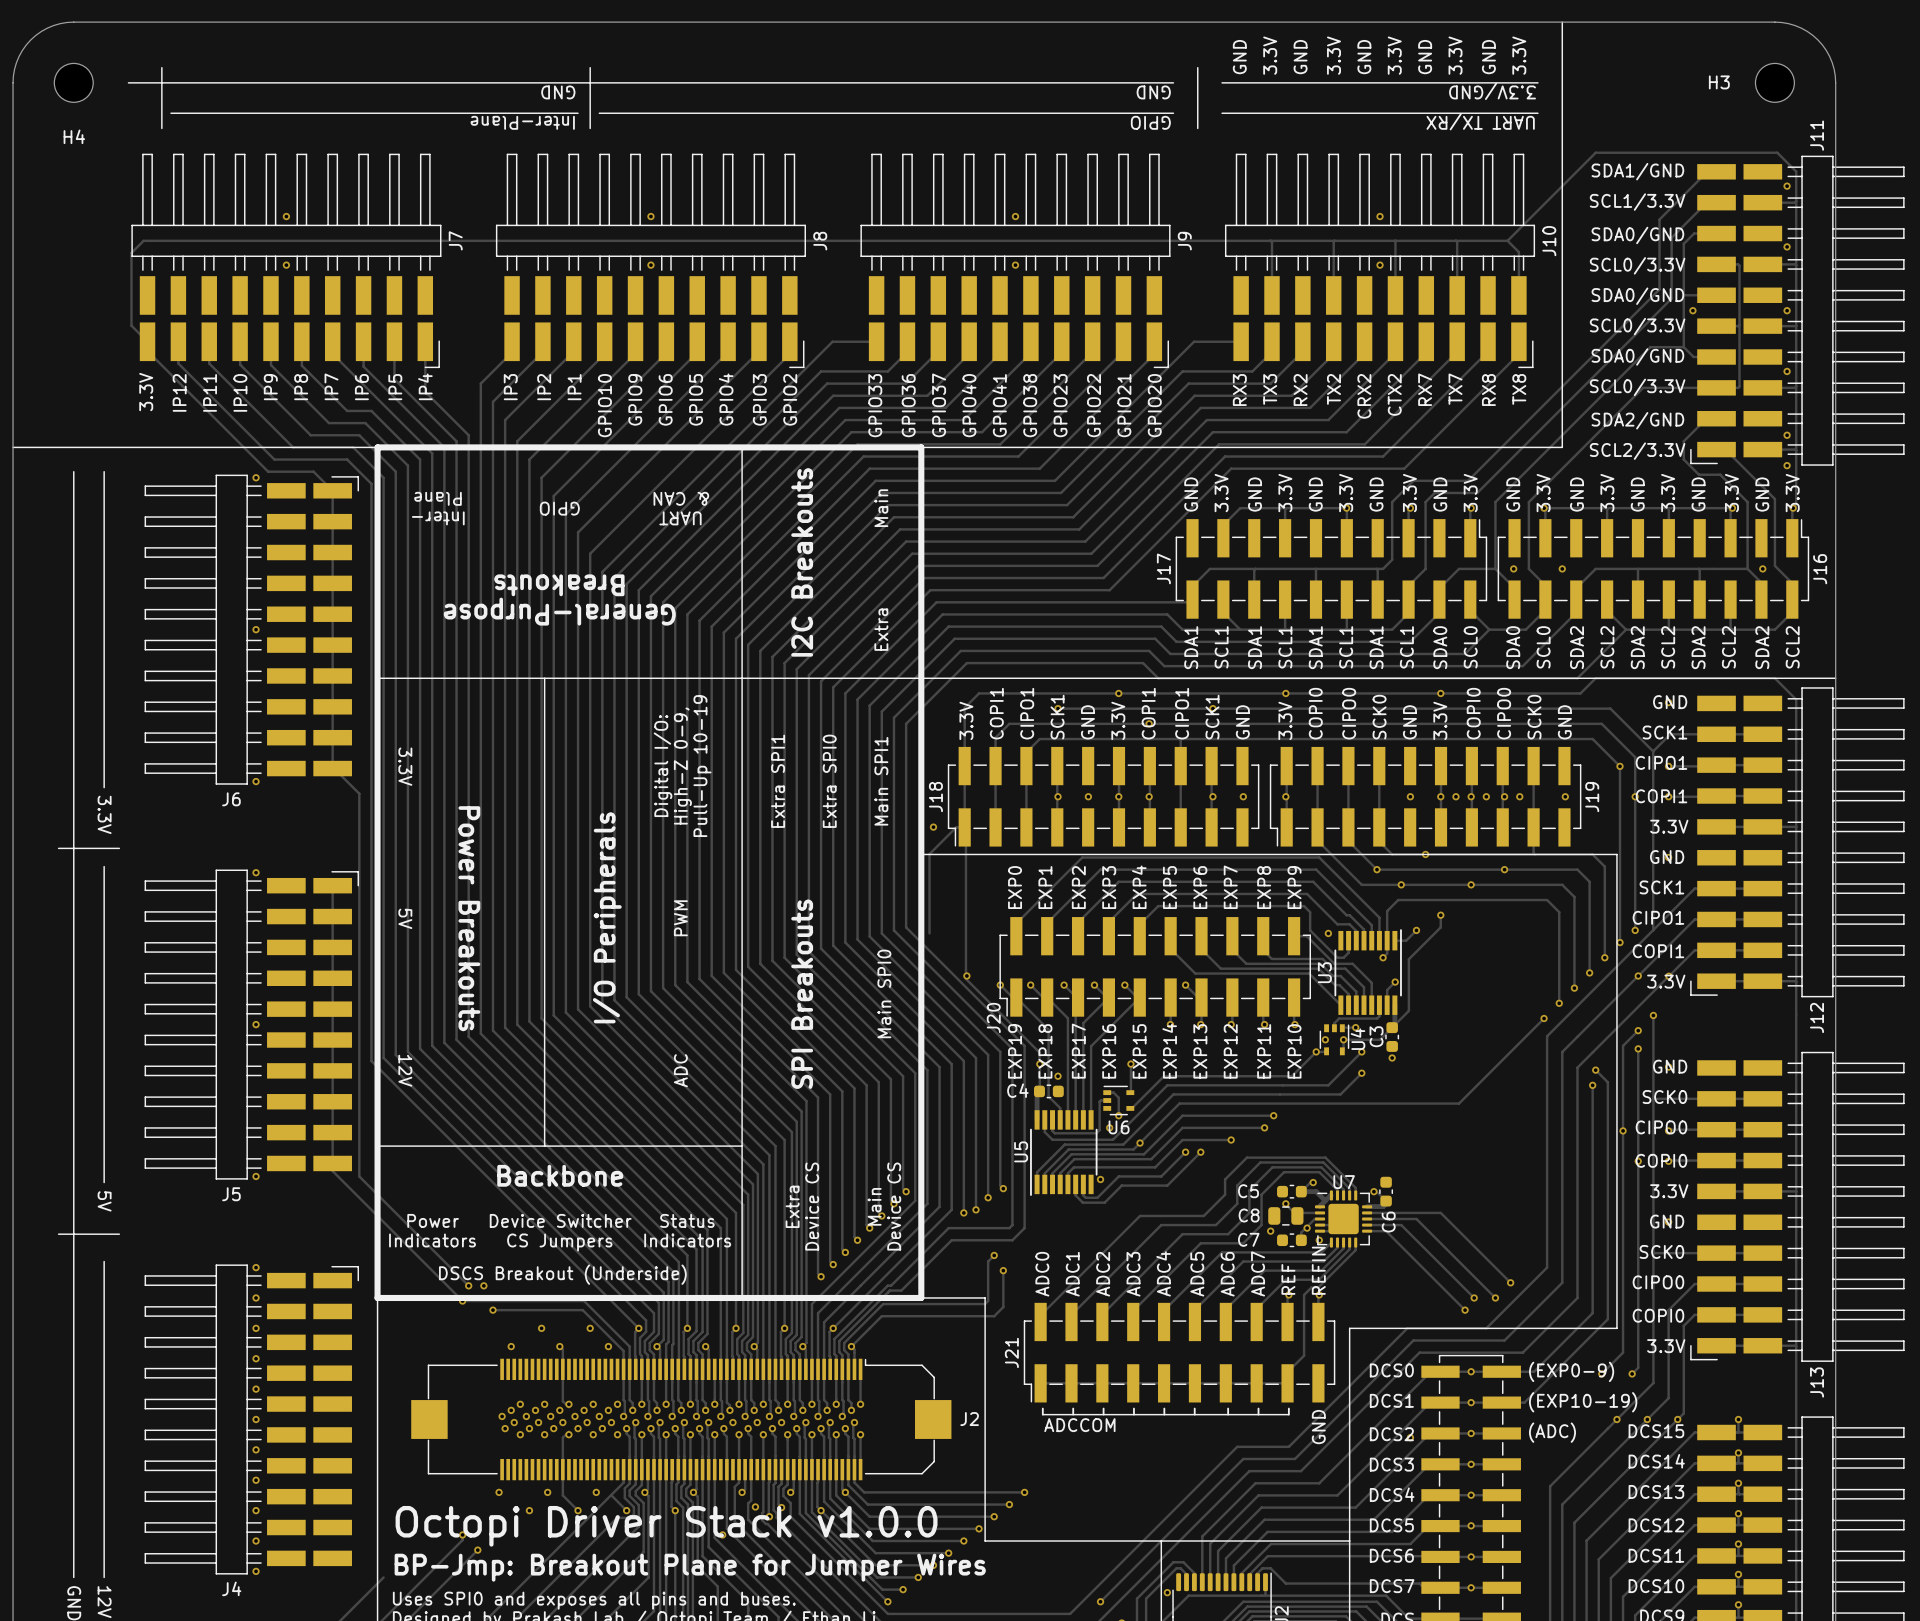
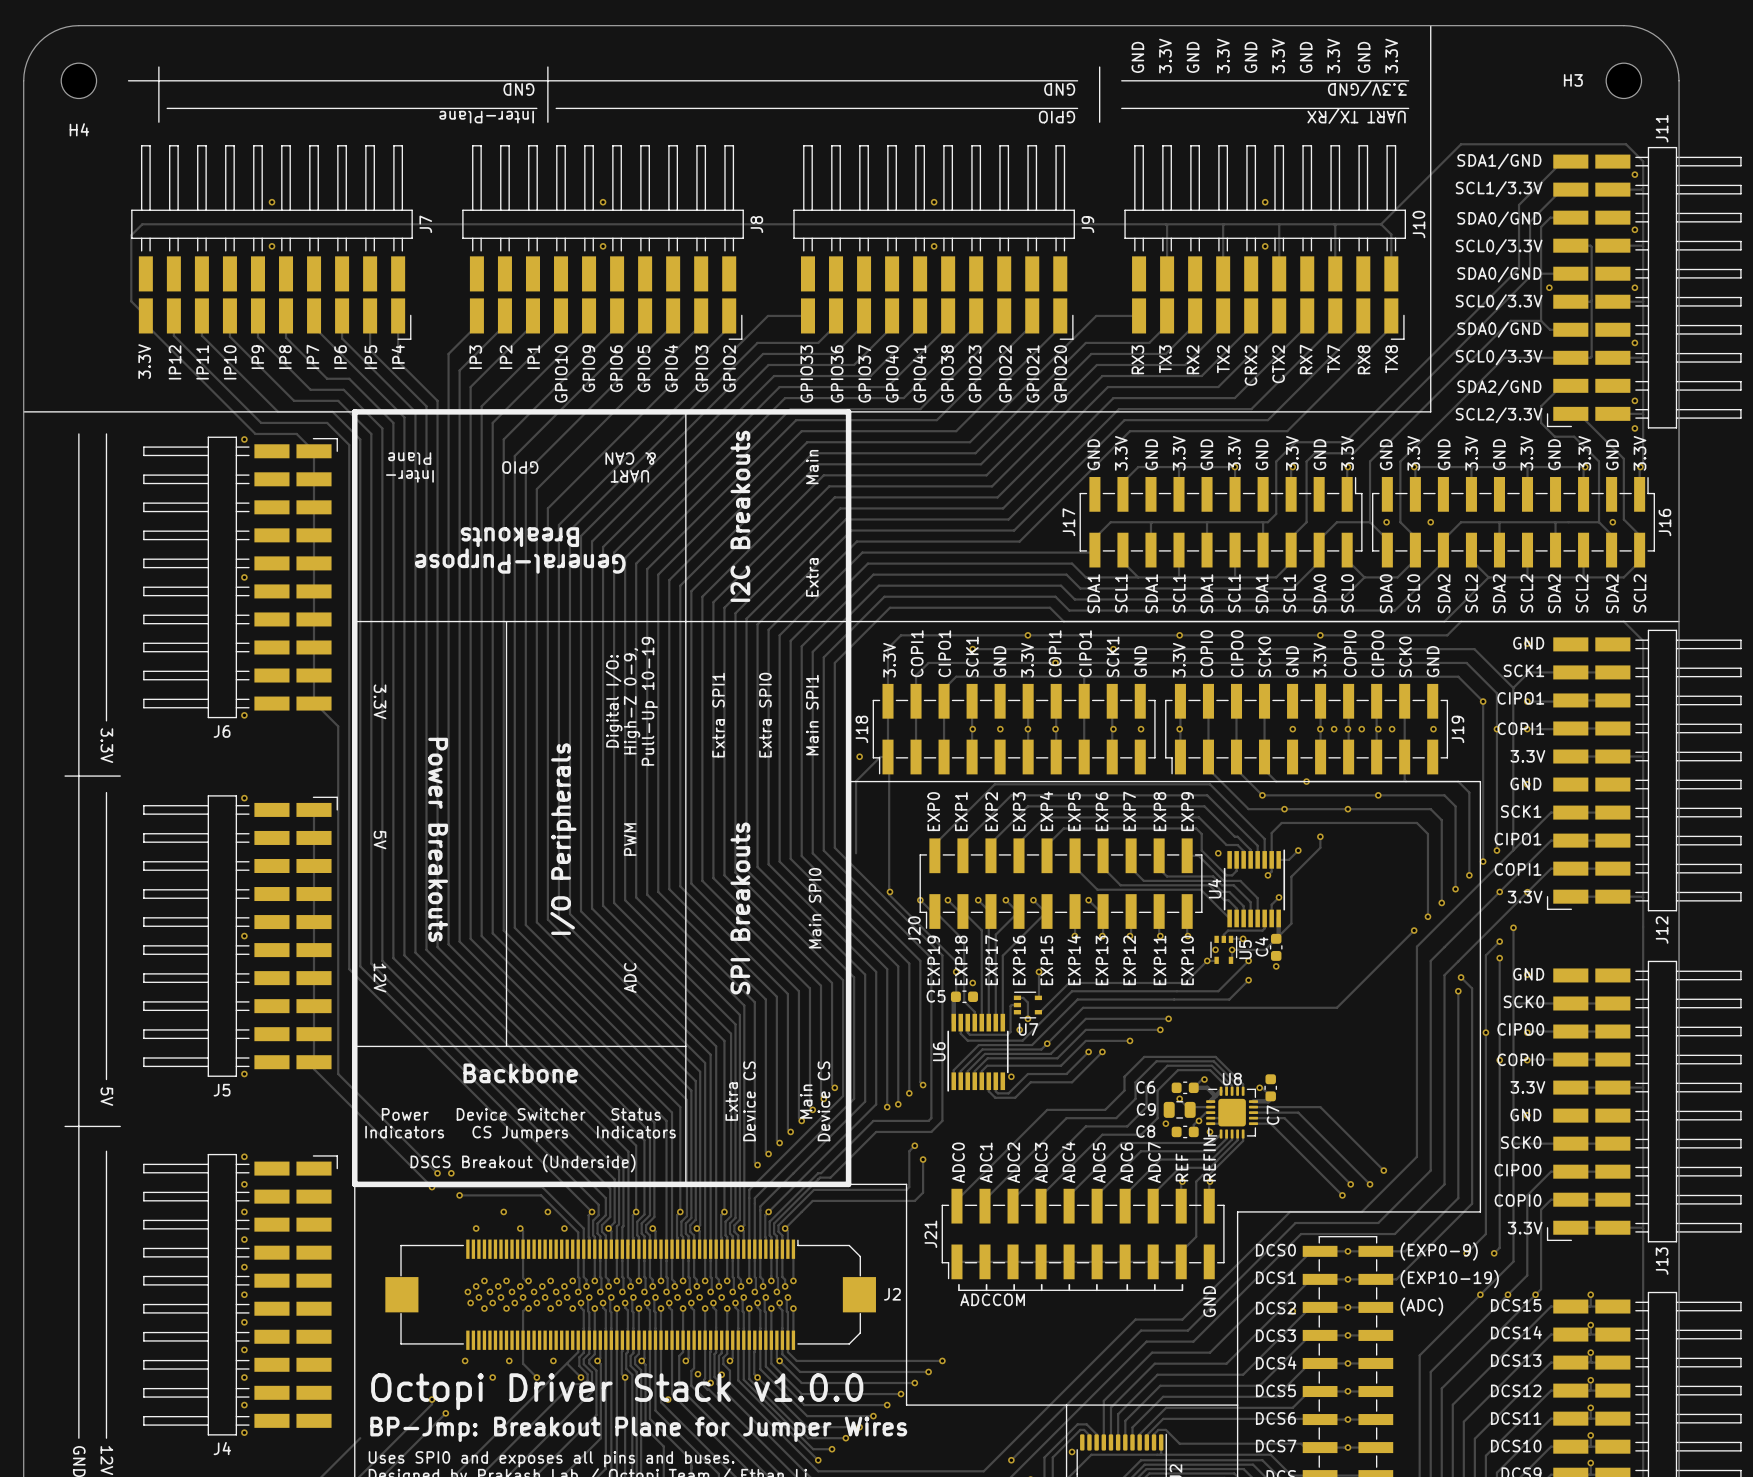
U3 name: U3 (1324, 972) -> U4 (1214, 888)
C3 name: C3 (1376, 1036) -> C4 (1261, 946)
U4 name: U4 (1358, 1039) -> U5 (1245, 949)
C4 name: C4 (1017, 1090) -> C5 (936, 996)
U6 name: U6 (1119, 1127) -> U7 (1028, 1029)
U5 name: U5 (1021, 1151) -> U6 (939, 1051)
U7 name: U7 (1344, 1182) -> U8 (1232, 1079)
C5 name: C5 (1248, 1191) -> C6 (1145, 1087)
C8 name: C8 (1249, 1215) -> C9 (1146, 1109)
C6 name: C6 (1388, 1222) -> C7 (1273, 1115)
C7 name: C7 (1248, 1239) -> C8 (1145, 1131)

